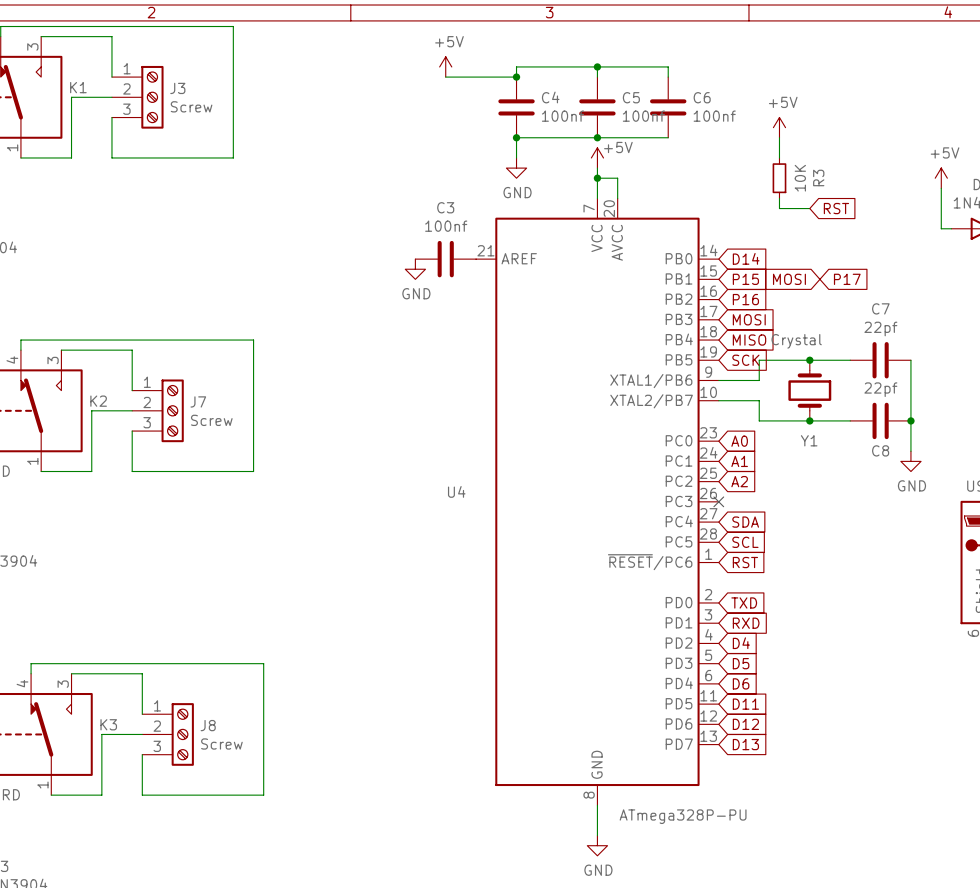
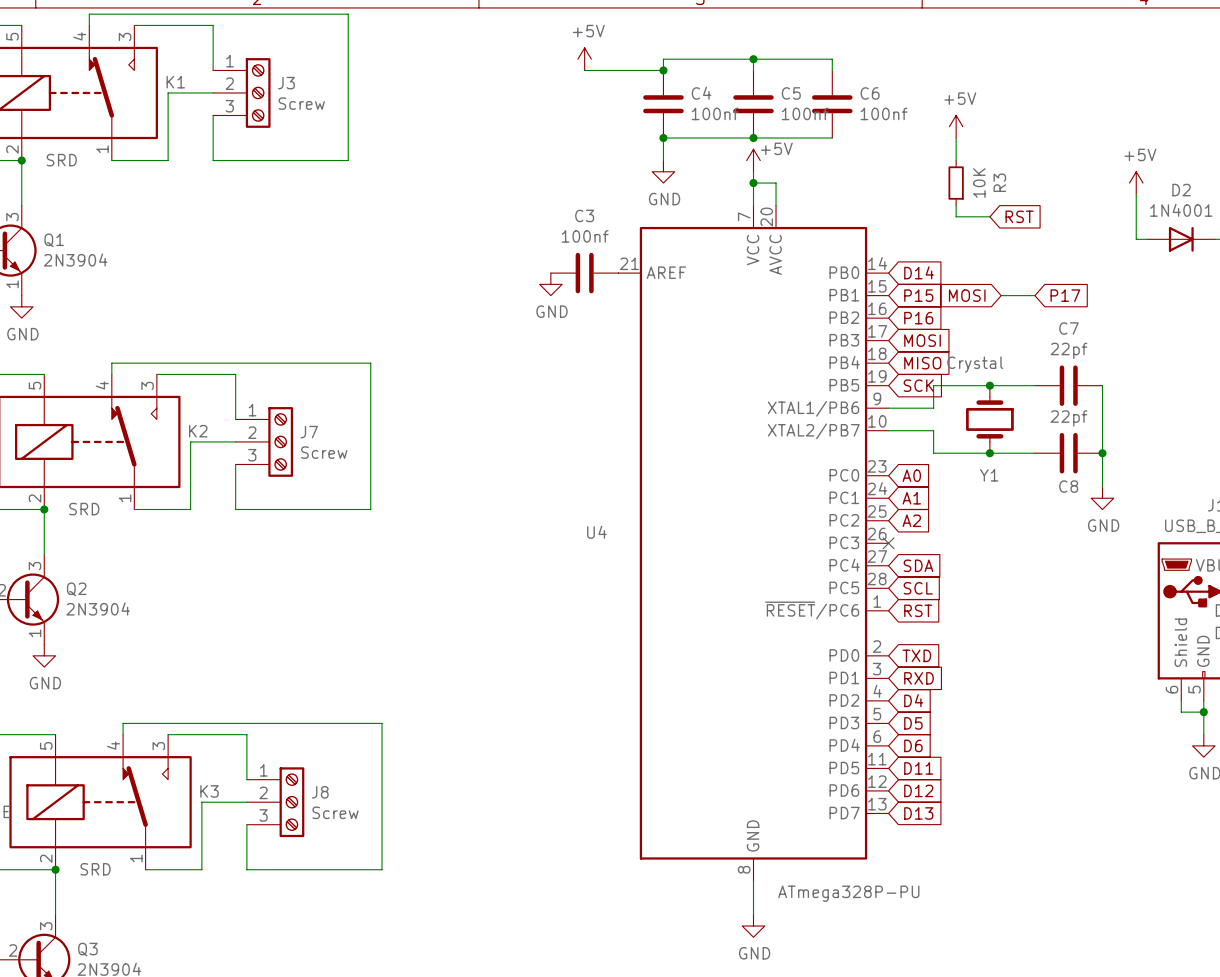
wire: none -> (1001, 295) (1034, 295)
global label position: P17 (847, 279) -> P17 (1065, 295)

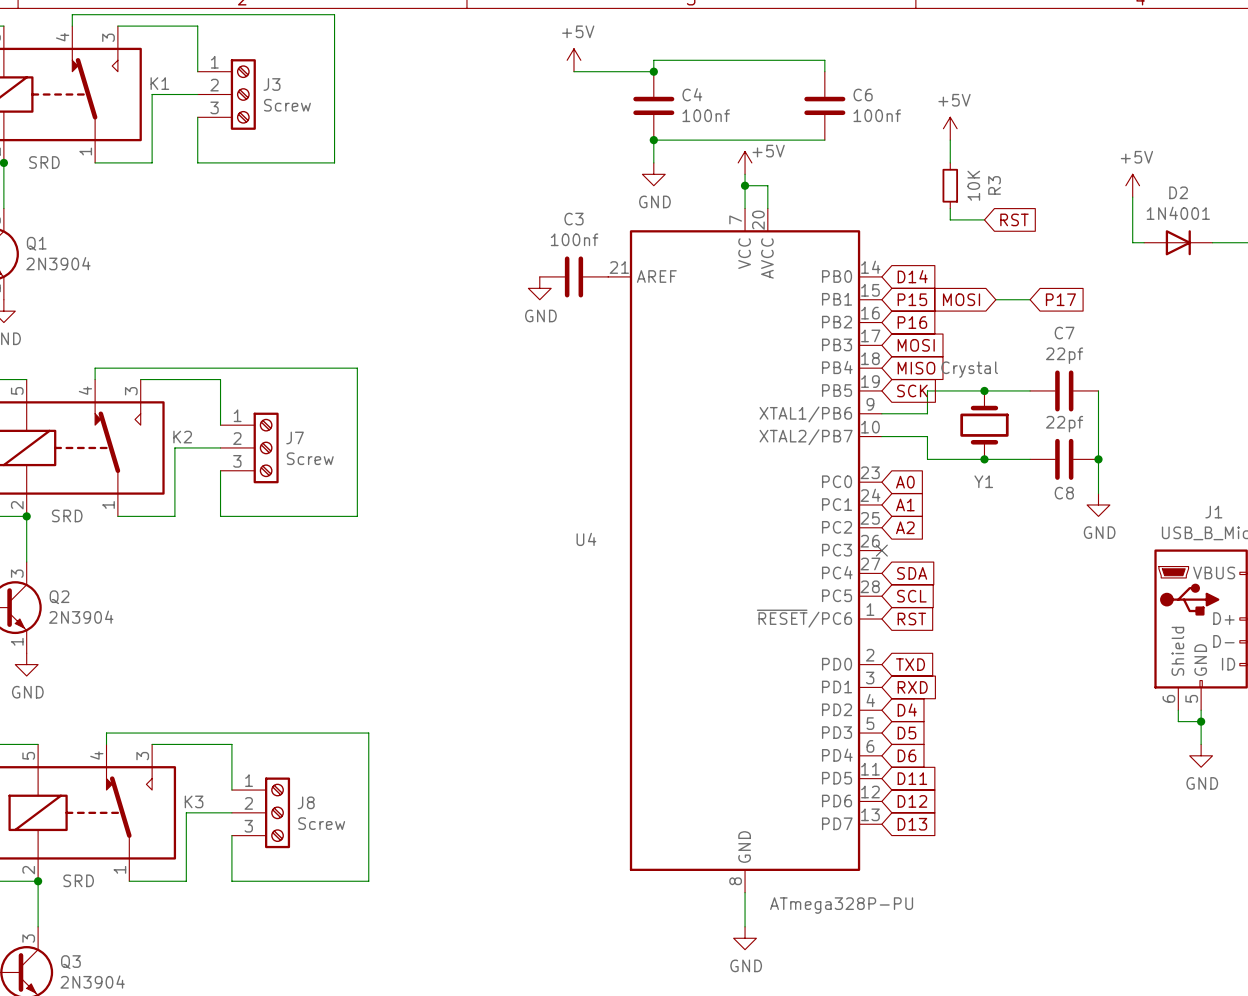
wire: (753, 59) (753, 70) -> none
junction: (753, 59) -> none
C5: 100nf (753, 104) -> none
junction: (753, 138) -> none

